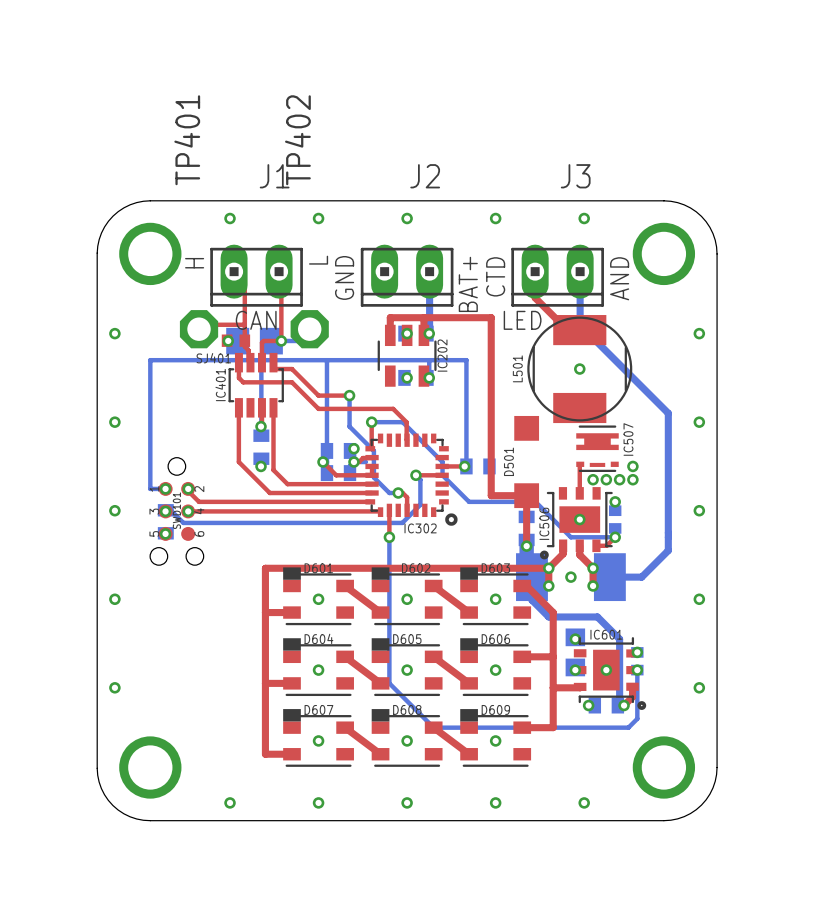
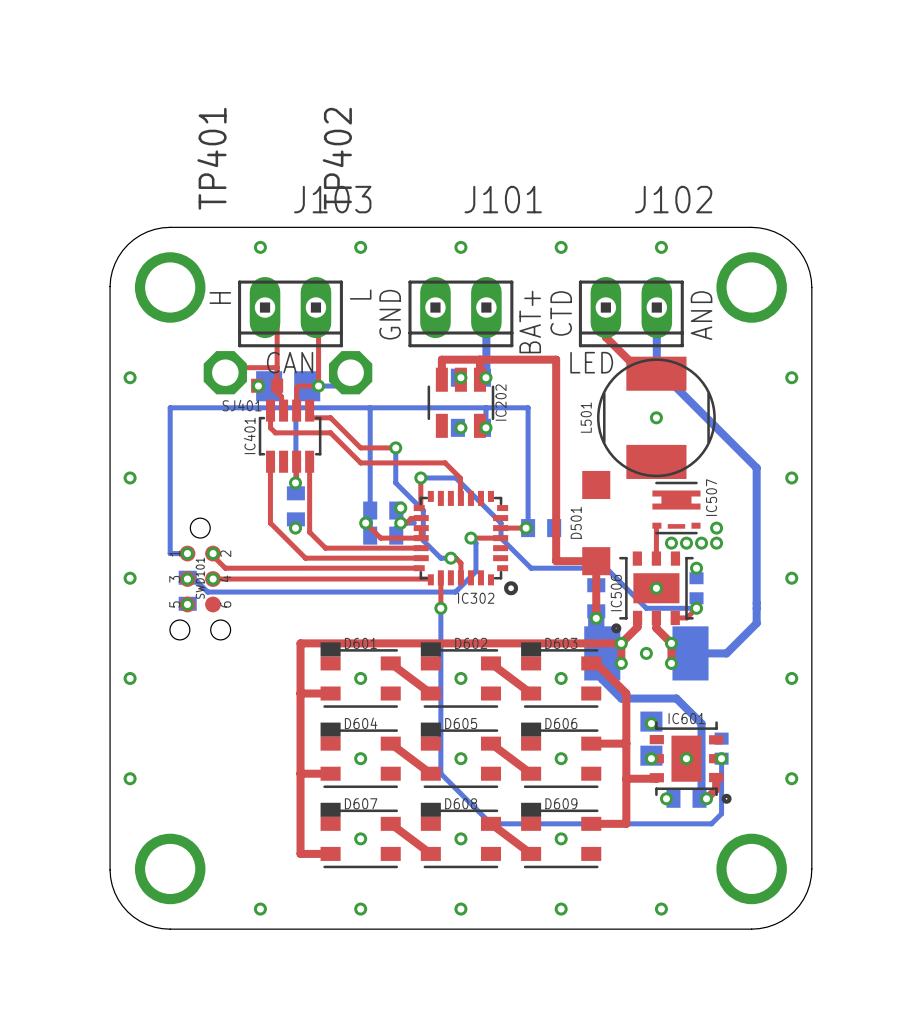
J1 name: J1 (274, 176) -> J103 (332, 199)
J2 name: J2 (425, 176) -> J101 (503, 199)
J3 name: J3 (575, 176) -> J102 (673, 199)
via: (637, 652) -> none

